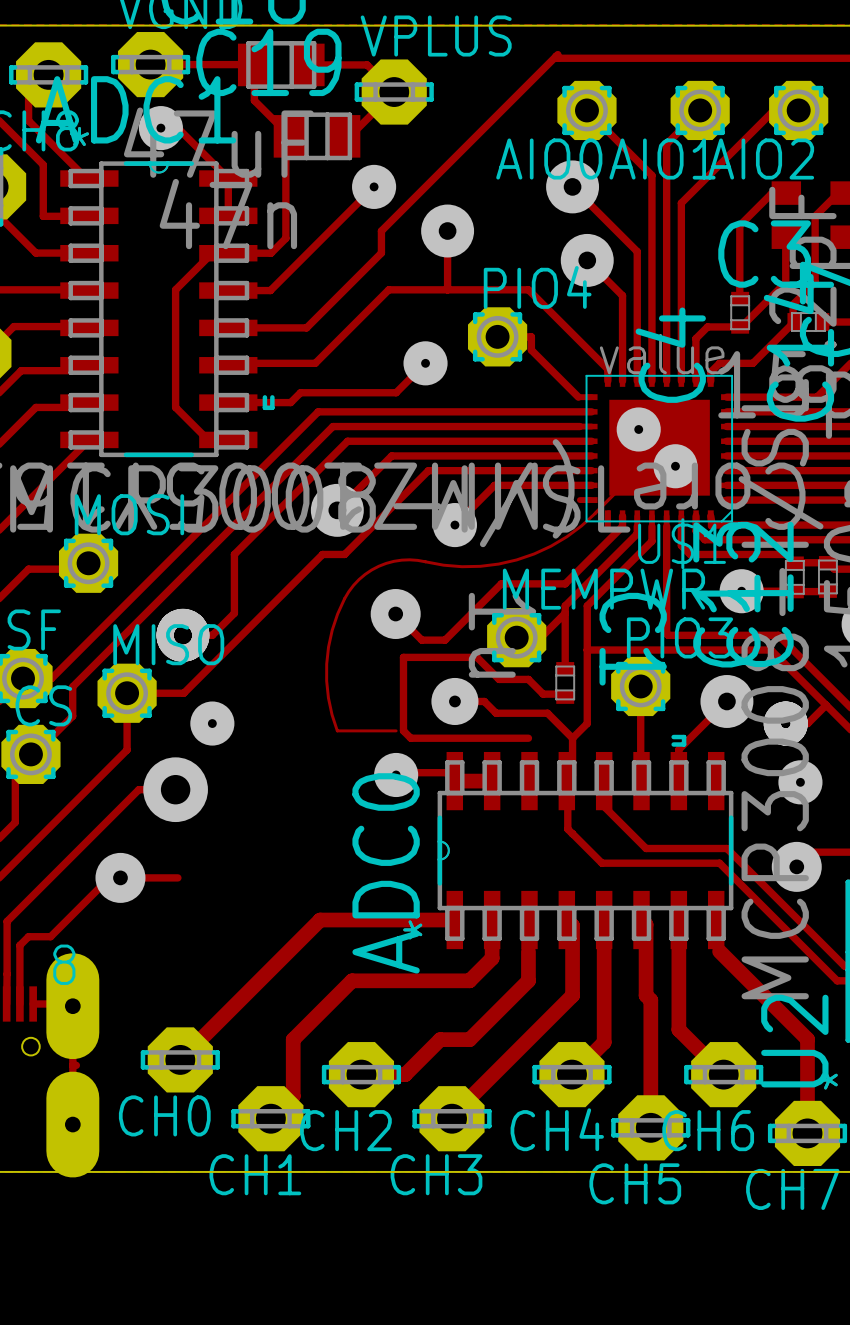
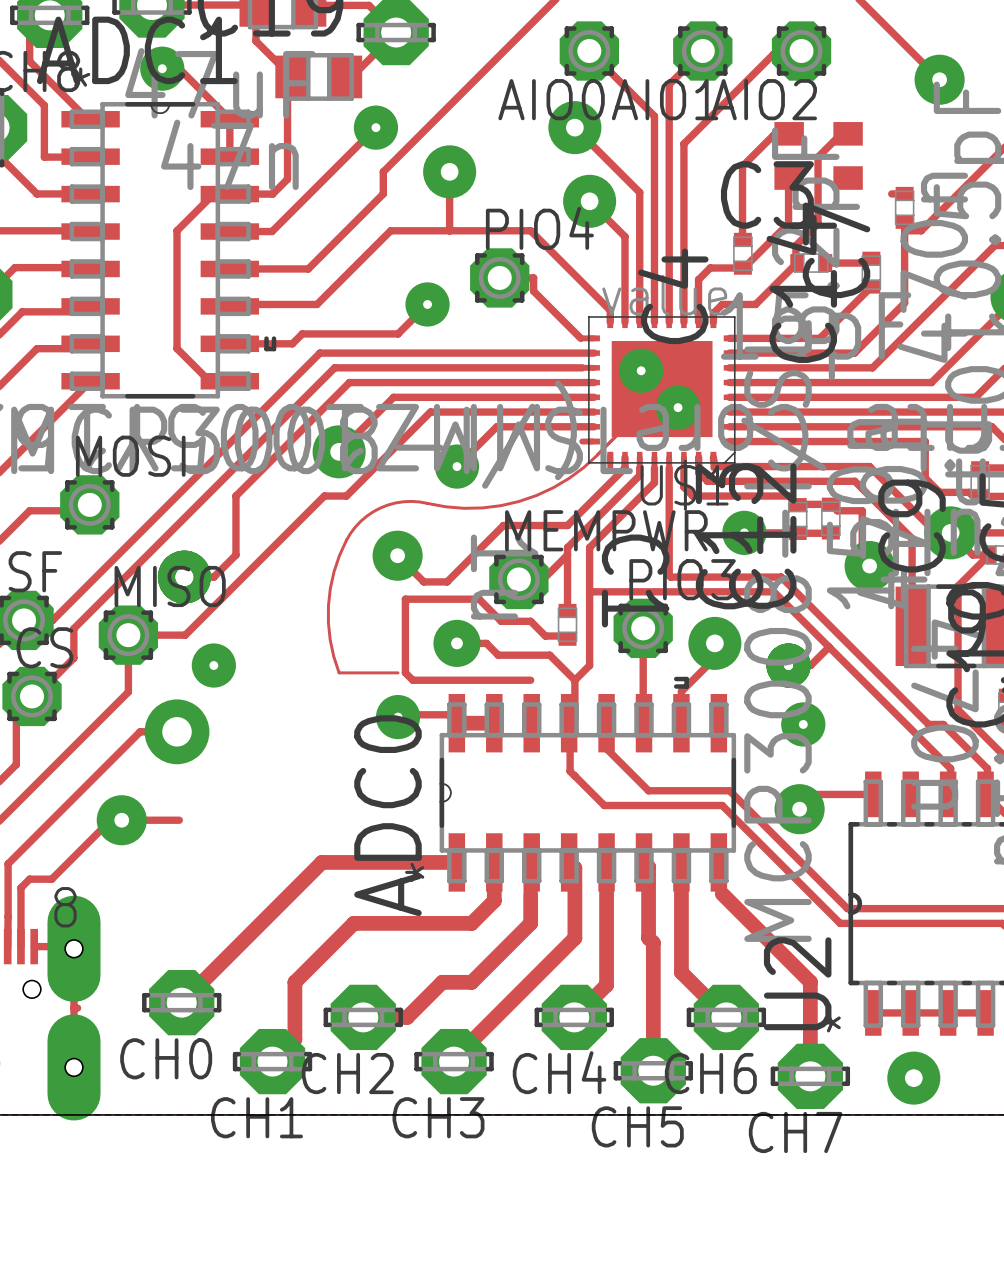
via position: (726, 701) -> (714, 643)

